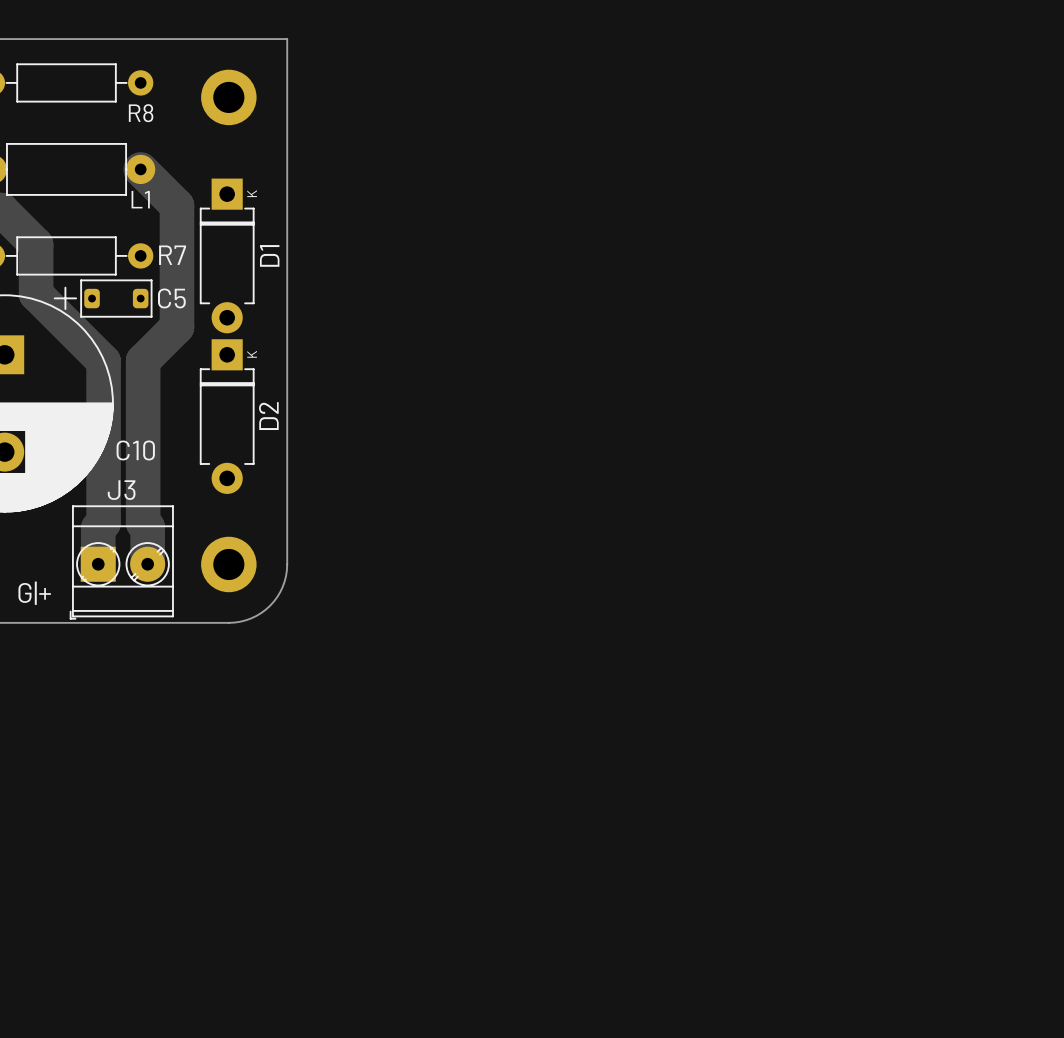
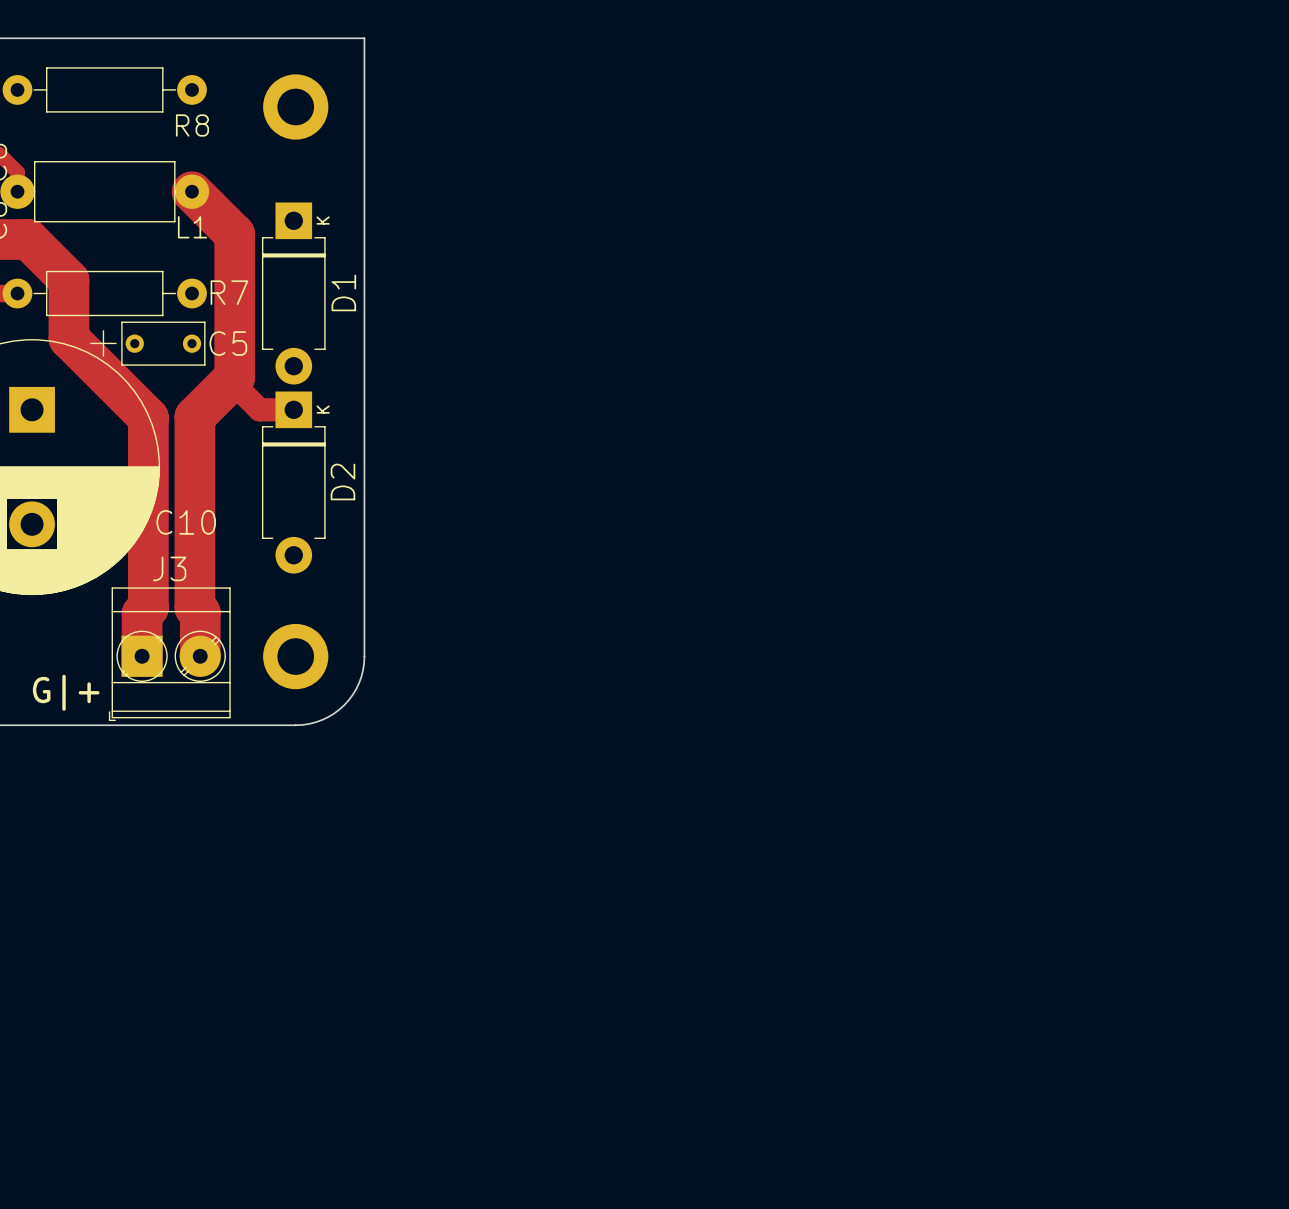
C5 footprint: [80, 279, 153, 318] -> [121, 321, 206, 366]
track: none -> (234, 384) (259, 409) (293, 409)

